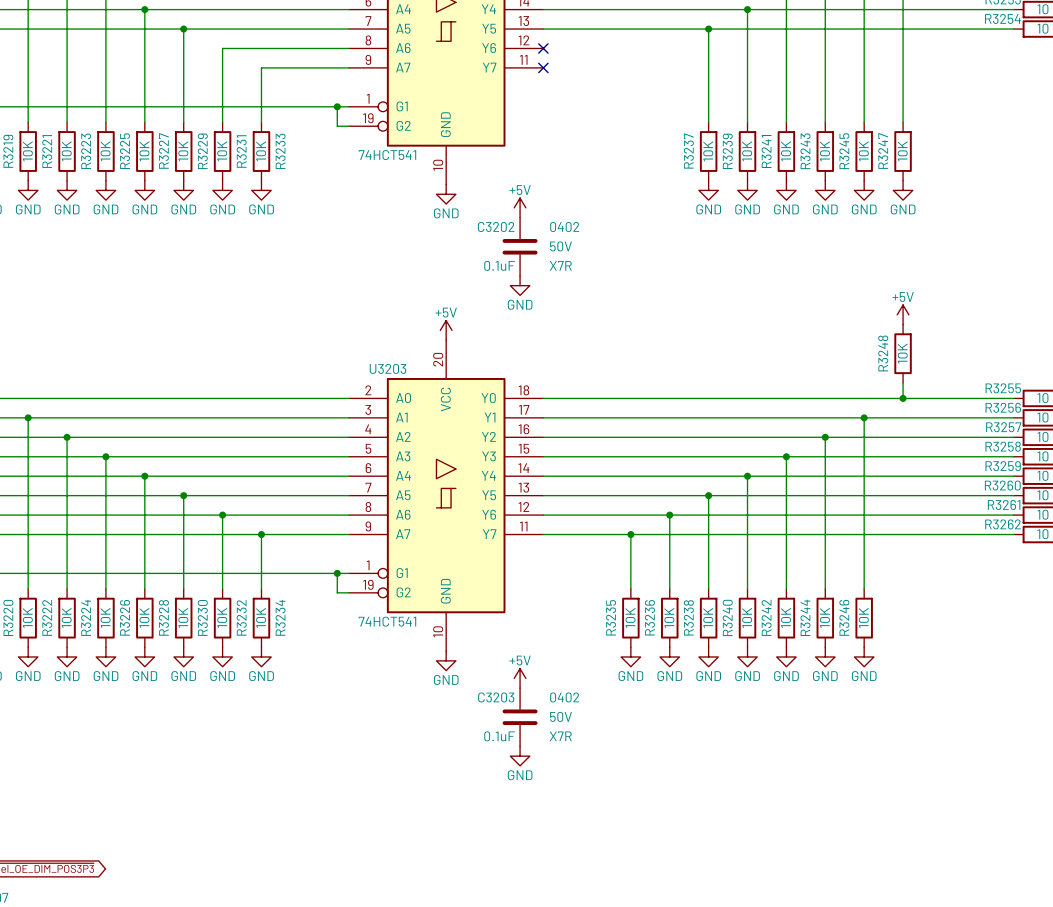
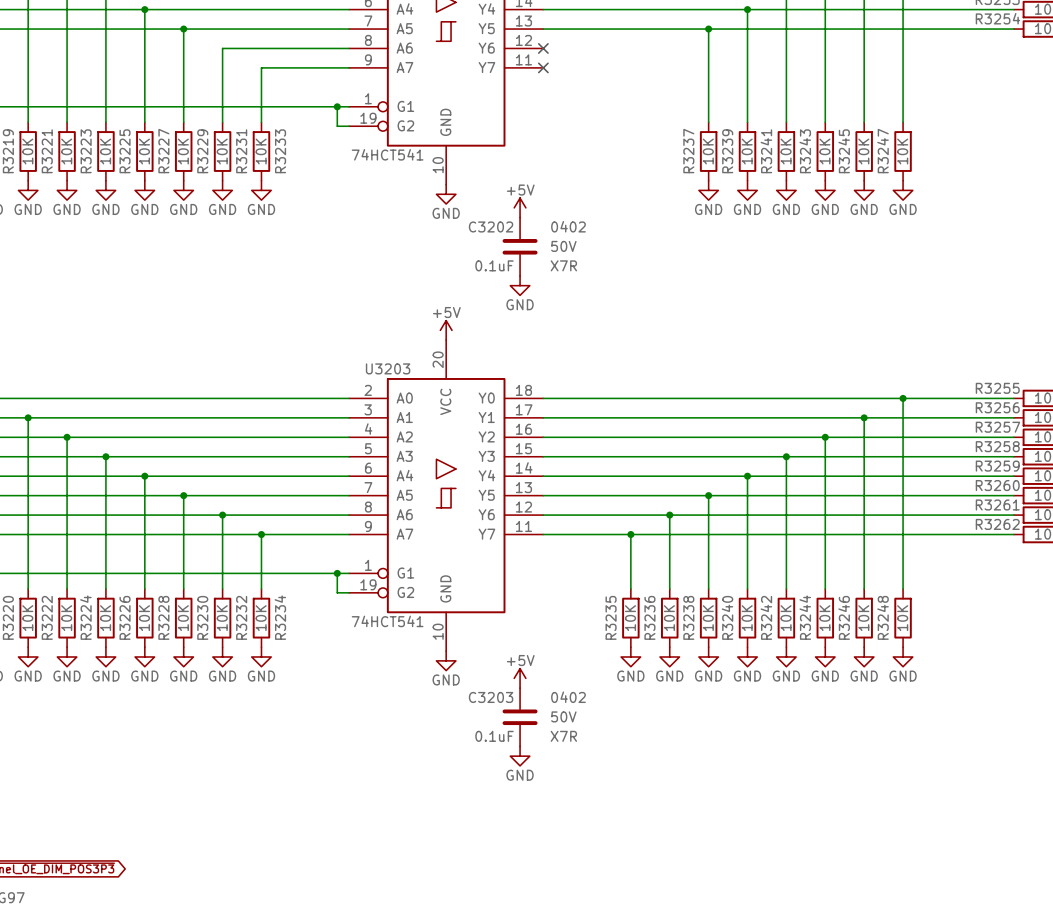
power symbol: +5V (903, 314) -> none
R3248 position: (903, 353) -> (903, 618)
wire: (903, 382) (903, 398) -> (903, 588) (903, 398)
power symbol: none -> GND (903, 657)

